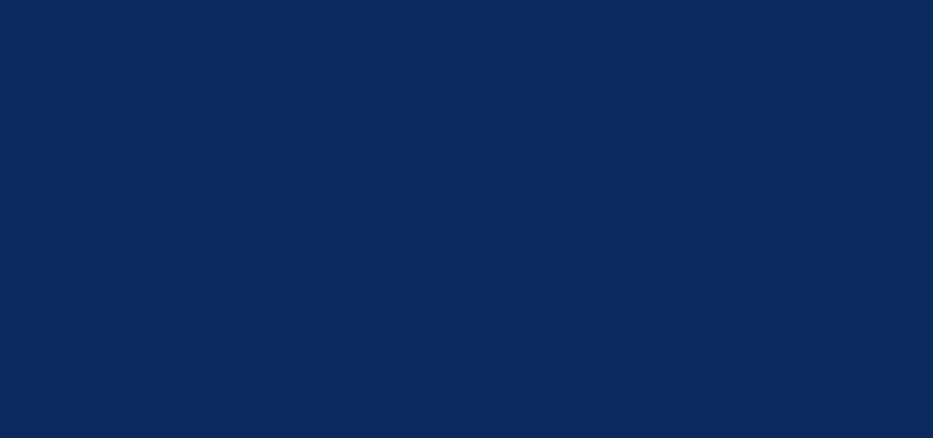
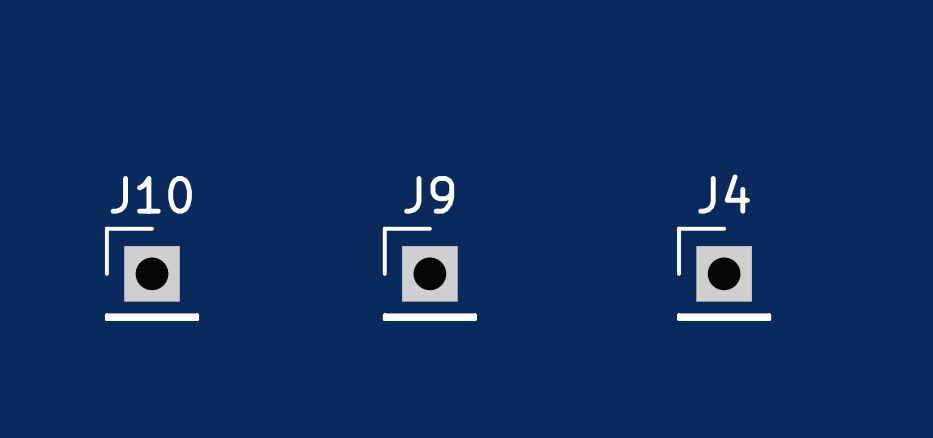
J10: none -> (152, 273)
J9: none -> (429, 273)
J4: none -> (724, 273)

